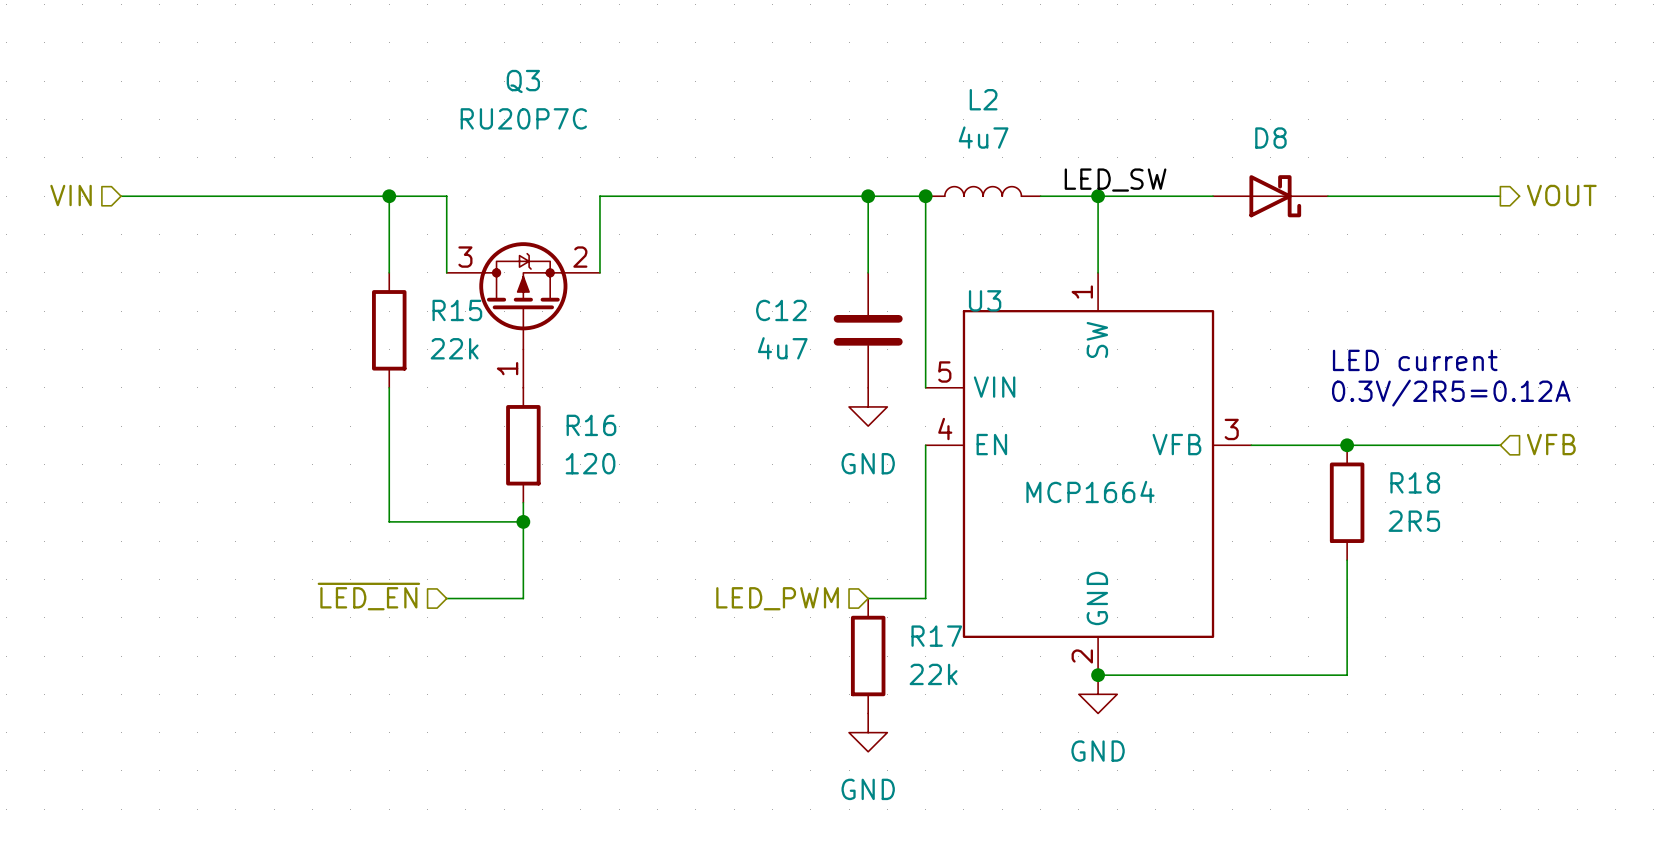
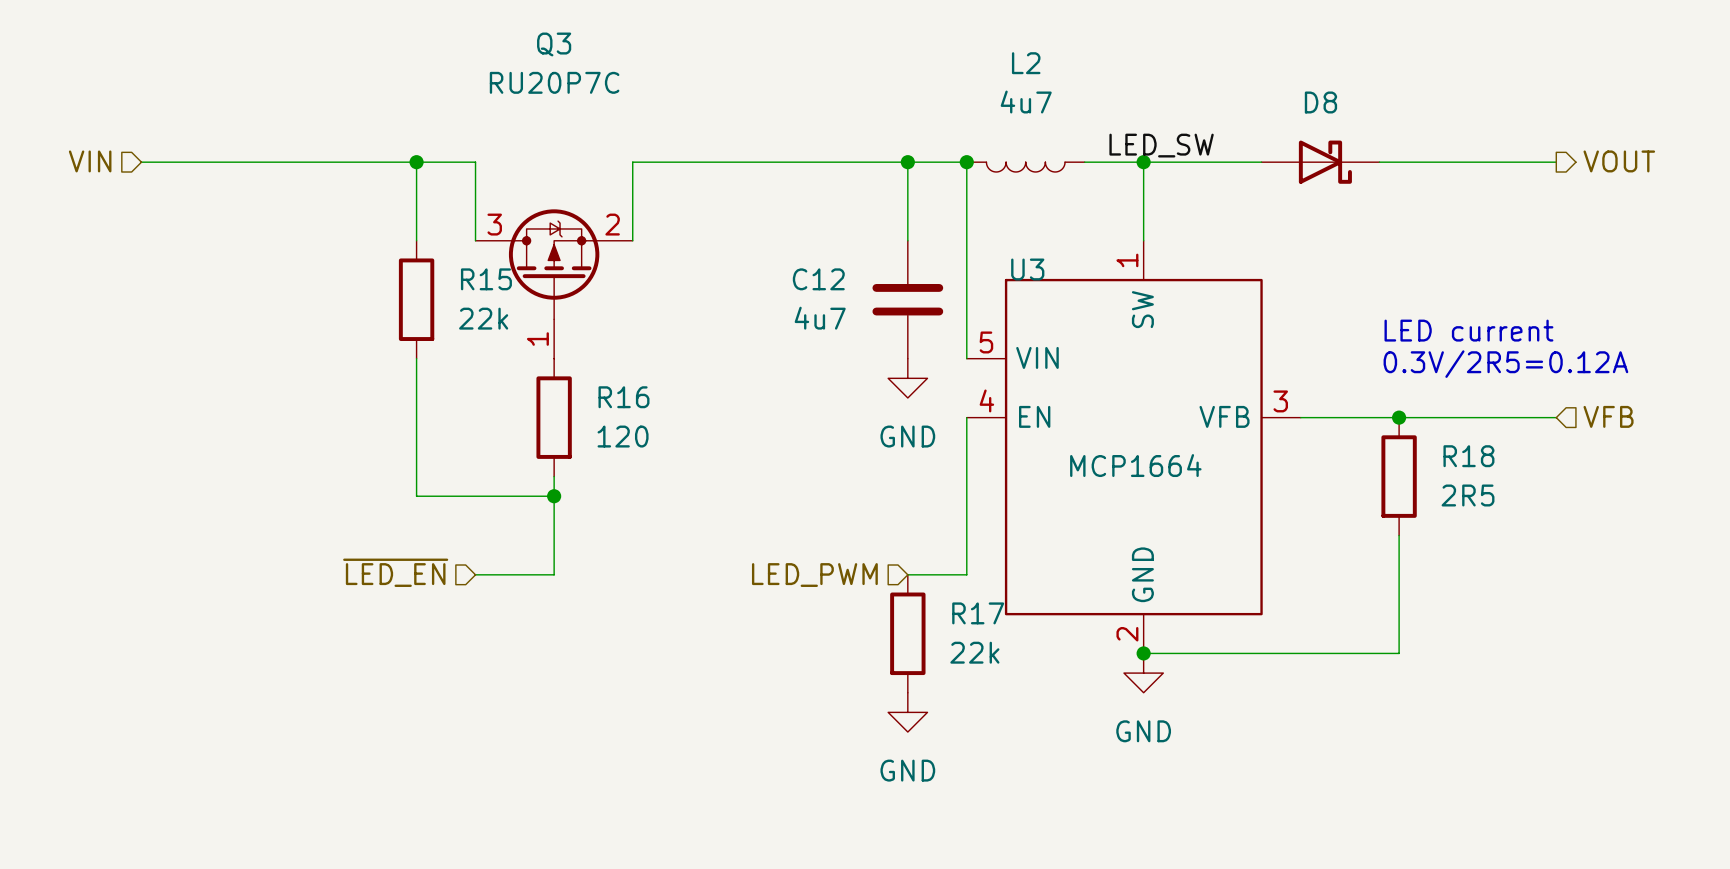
L2 rotation: 0° (983, 191) -> 180° (1025, 167)

